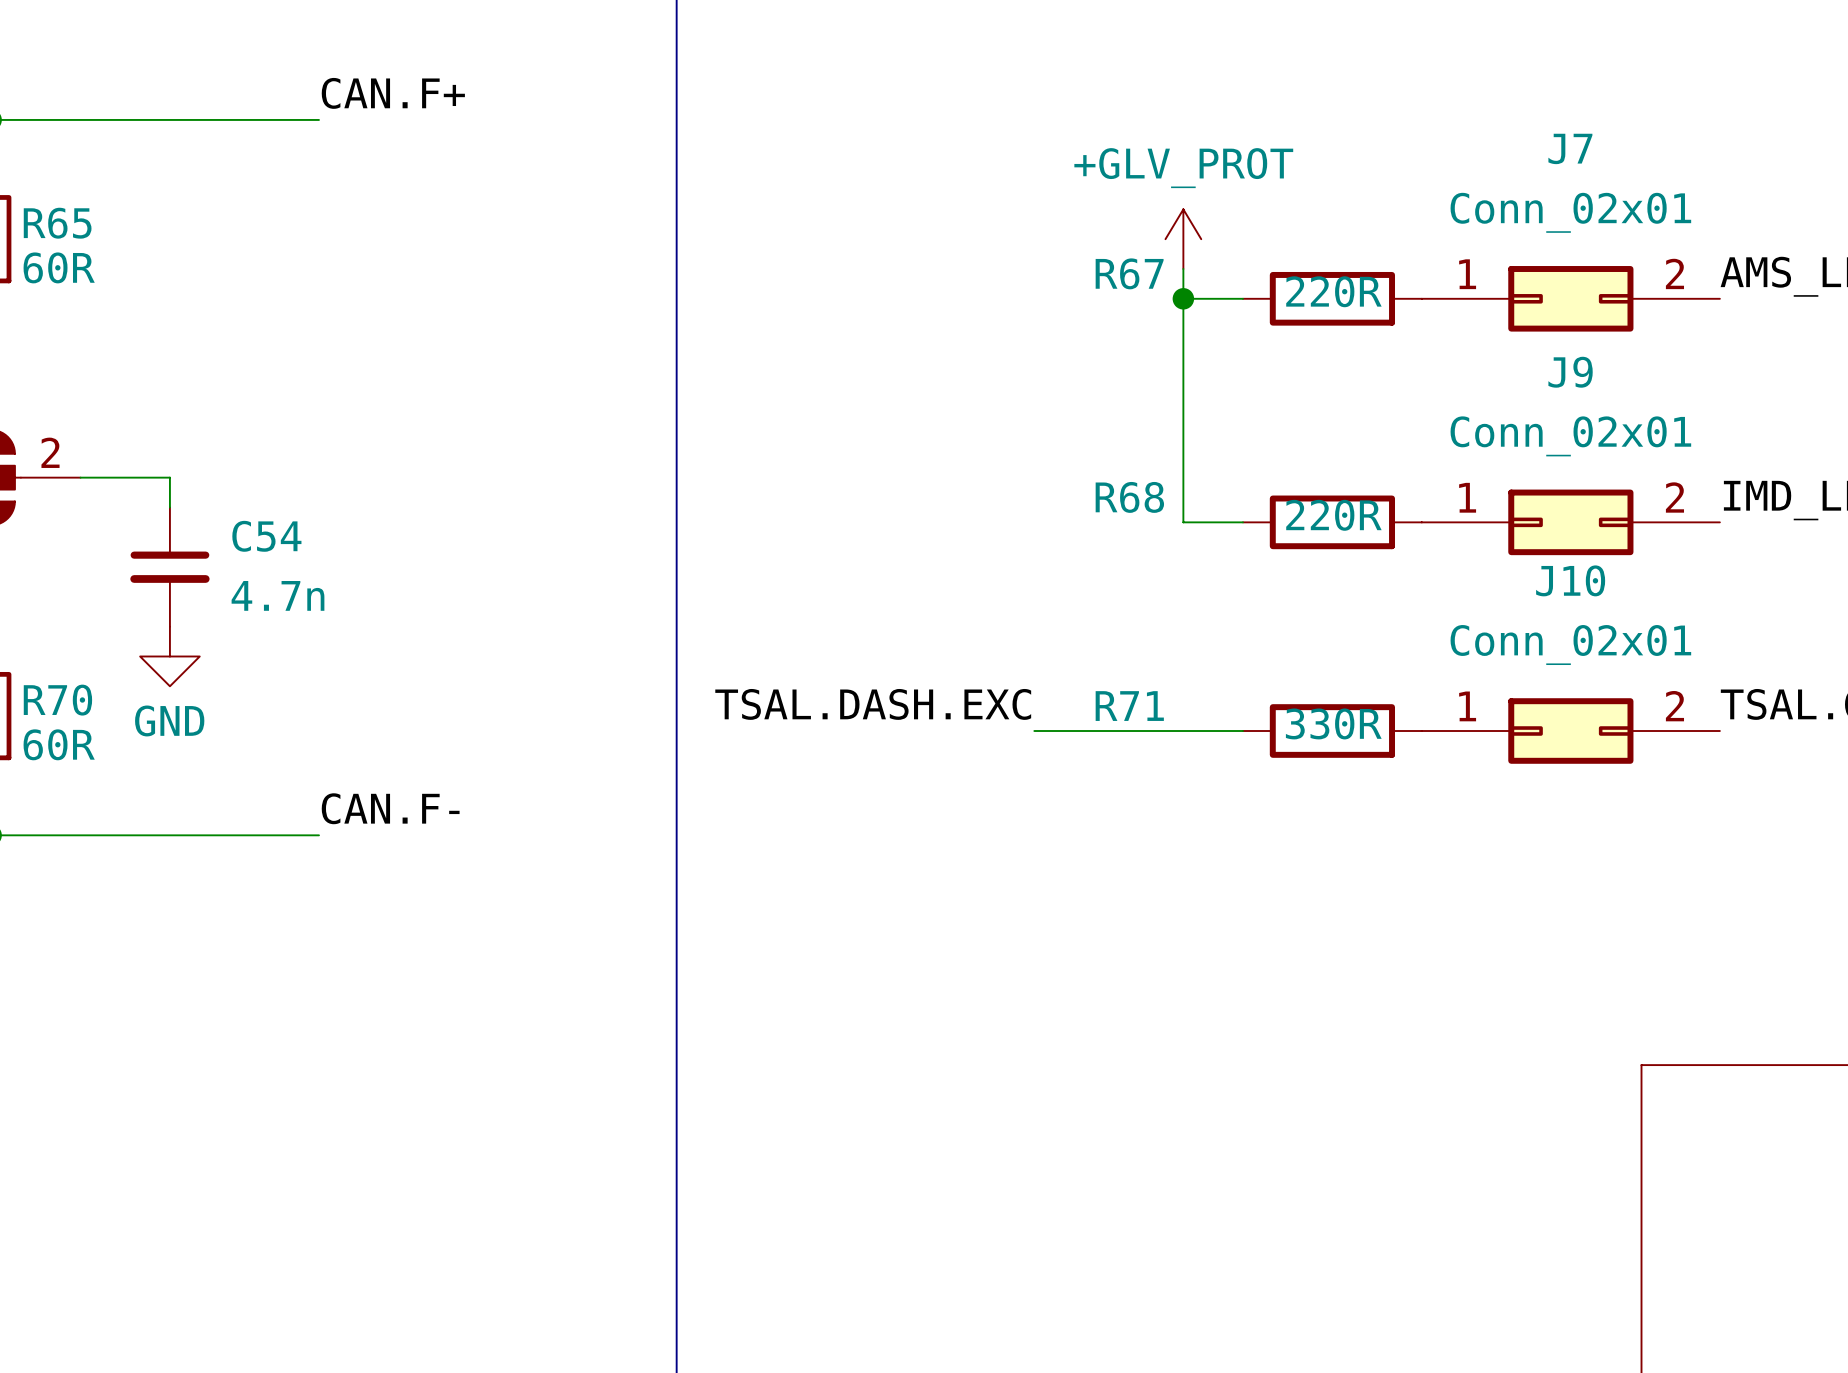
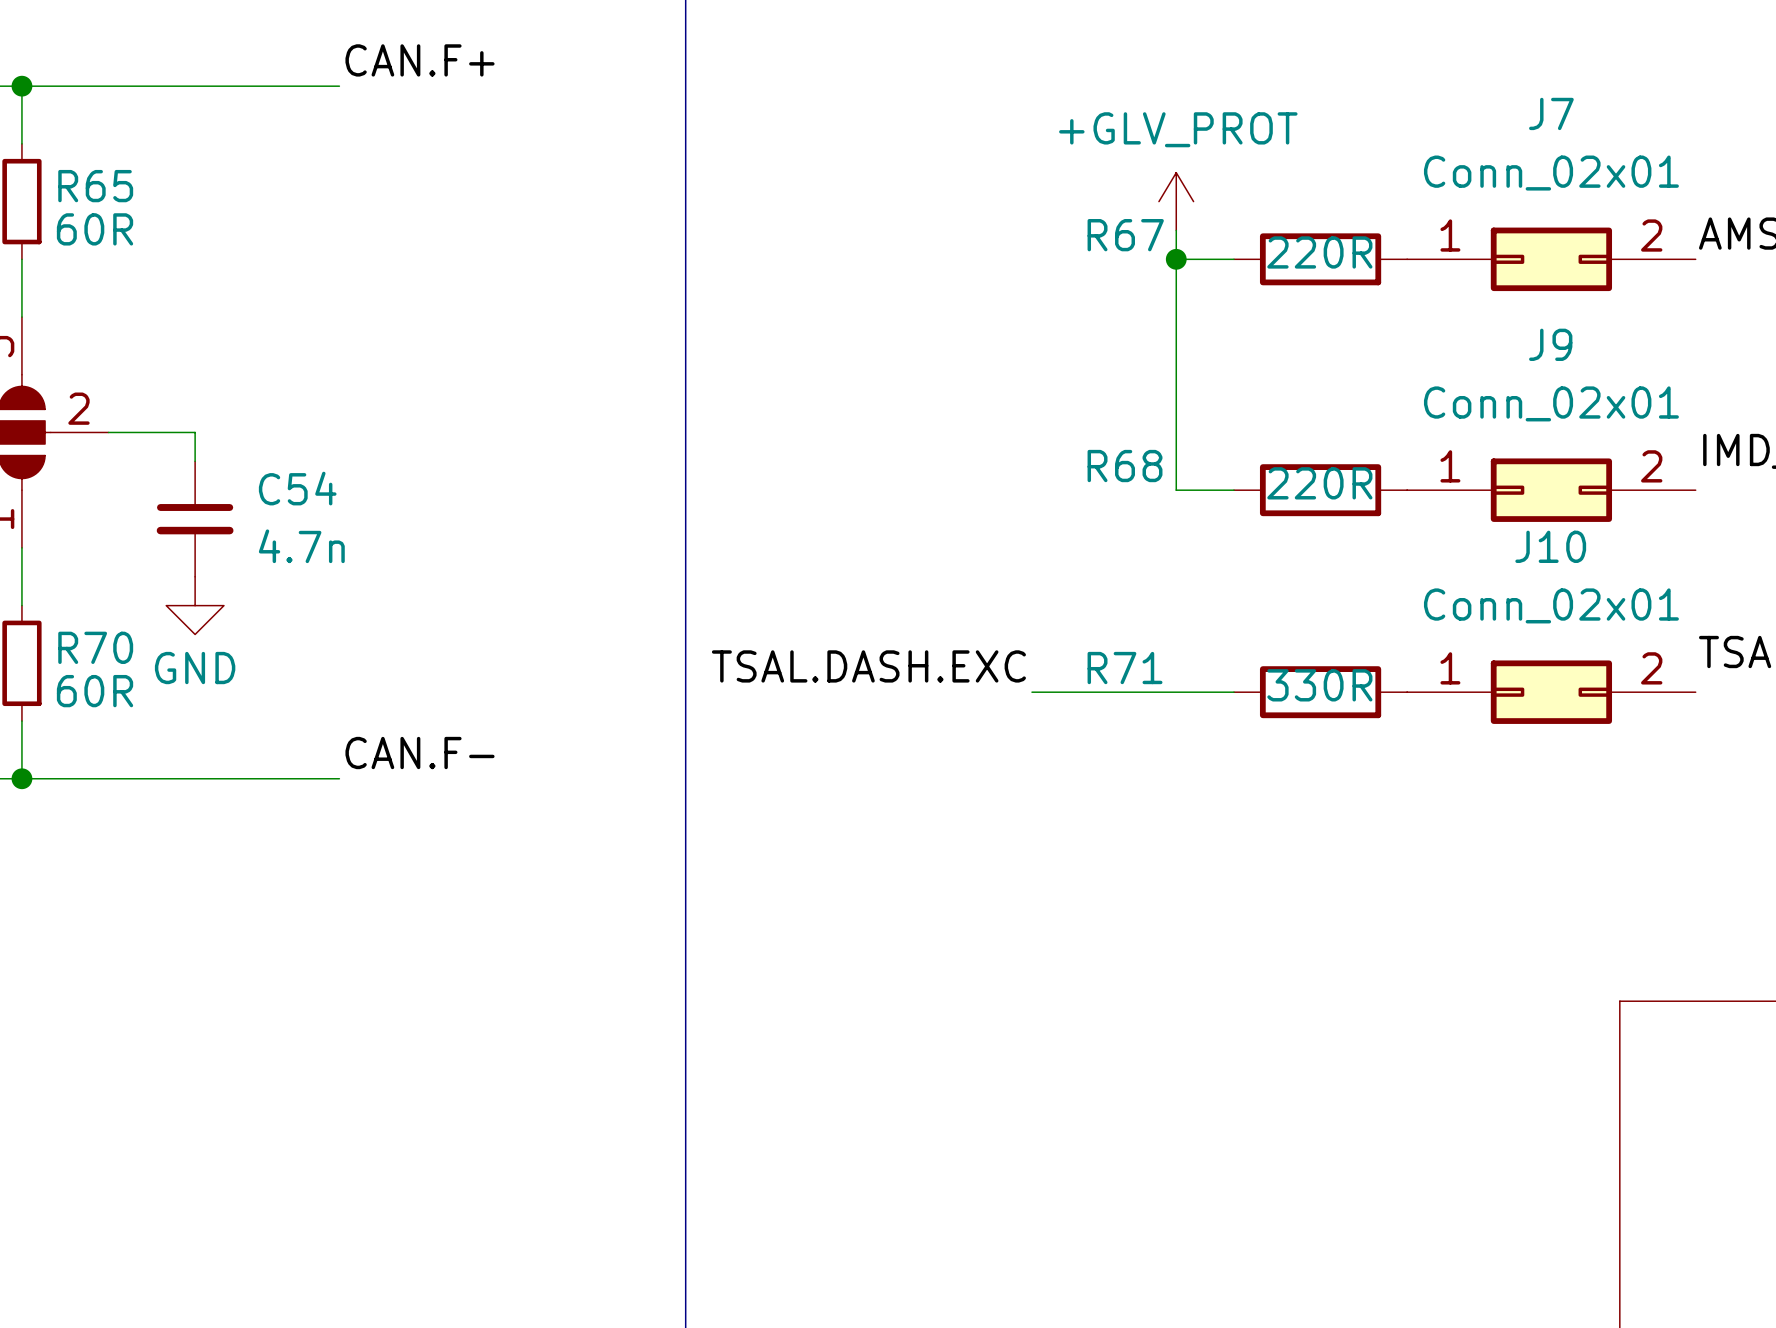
wire: (1183, 522) (1242, 522) -> (1176, 475) (1176, 490) (1233, 490)
R68 position: (1332, 522) -> (1320, 490)
J9 position: (1570, 522) -> (1551, 490)
label position: TSAL.DASH.EXC (873, 704) -> TSAL.DASH.EXC (868, 666)
wire: (1034, 731) (1242, 731) -> (1031, 692) (1233, 692)
R71 position: (1332, 731) -> (1320, 692)
J10 position: (1570, 731) -> (1551, 692)

